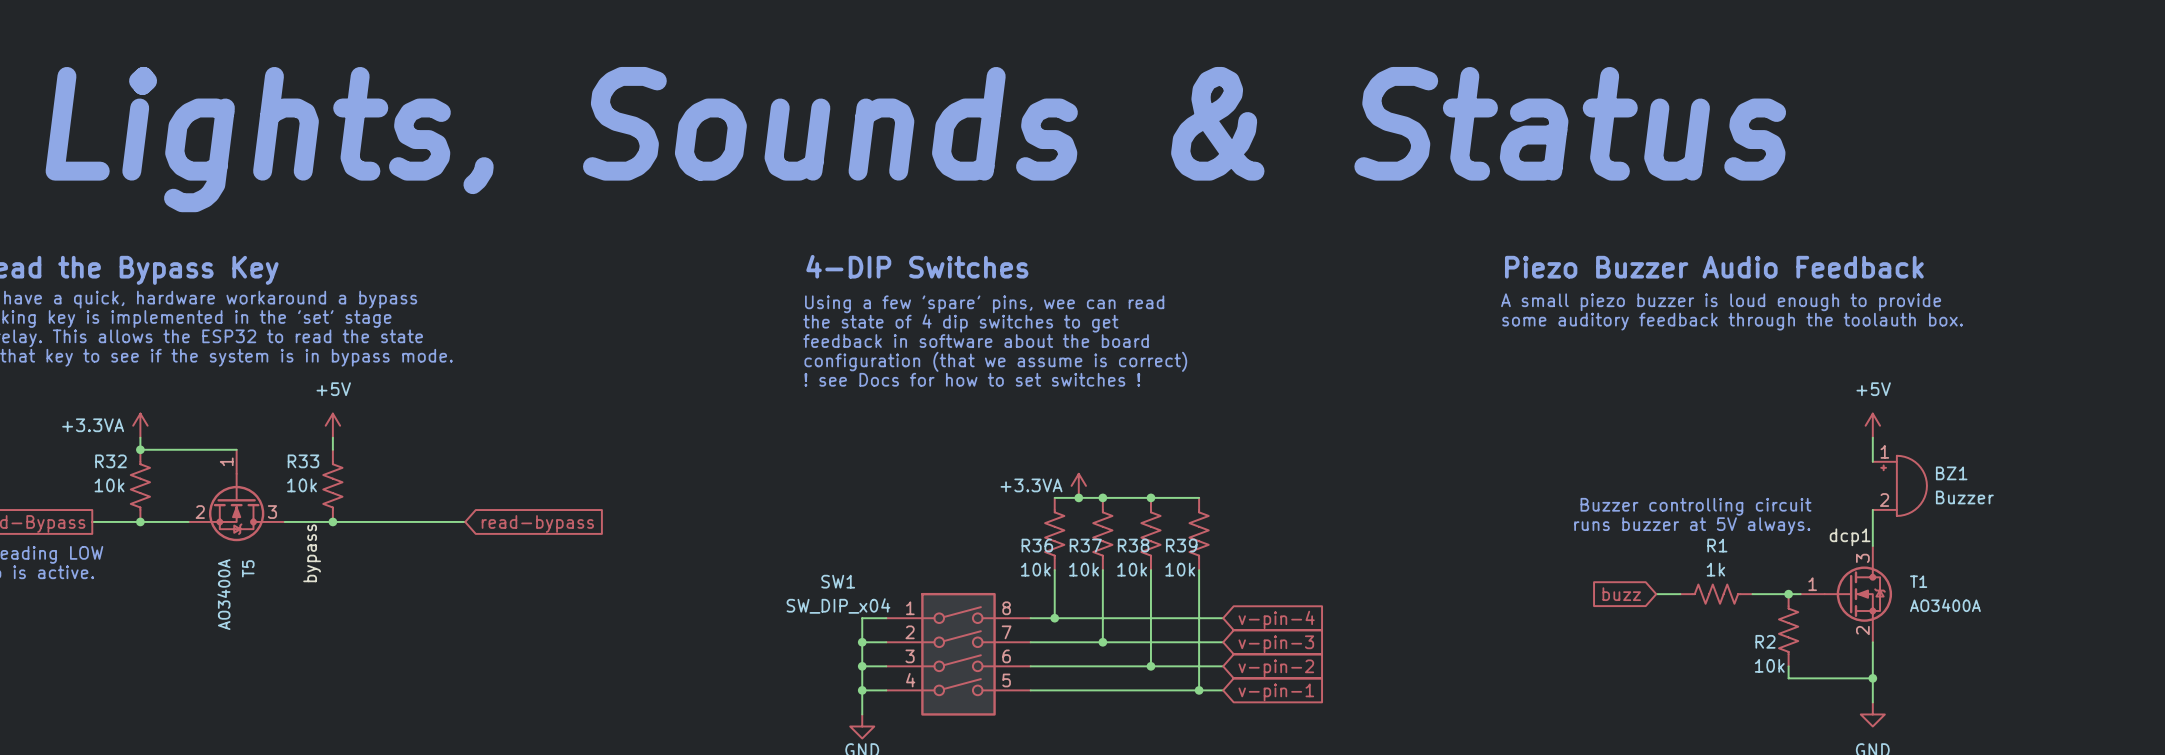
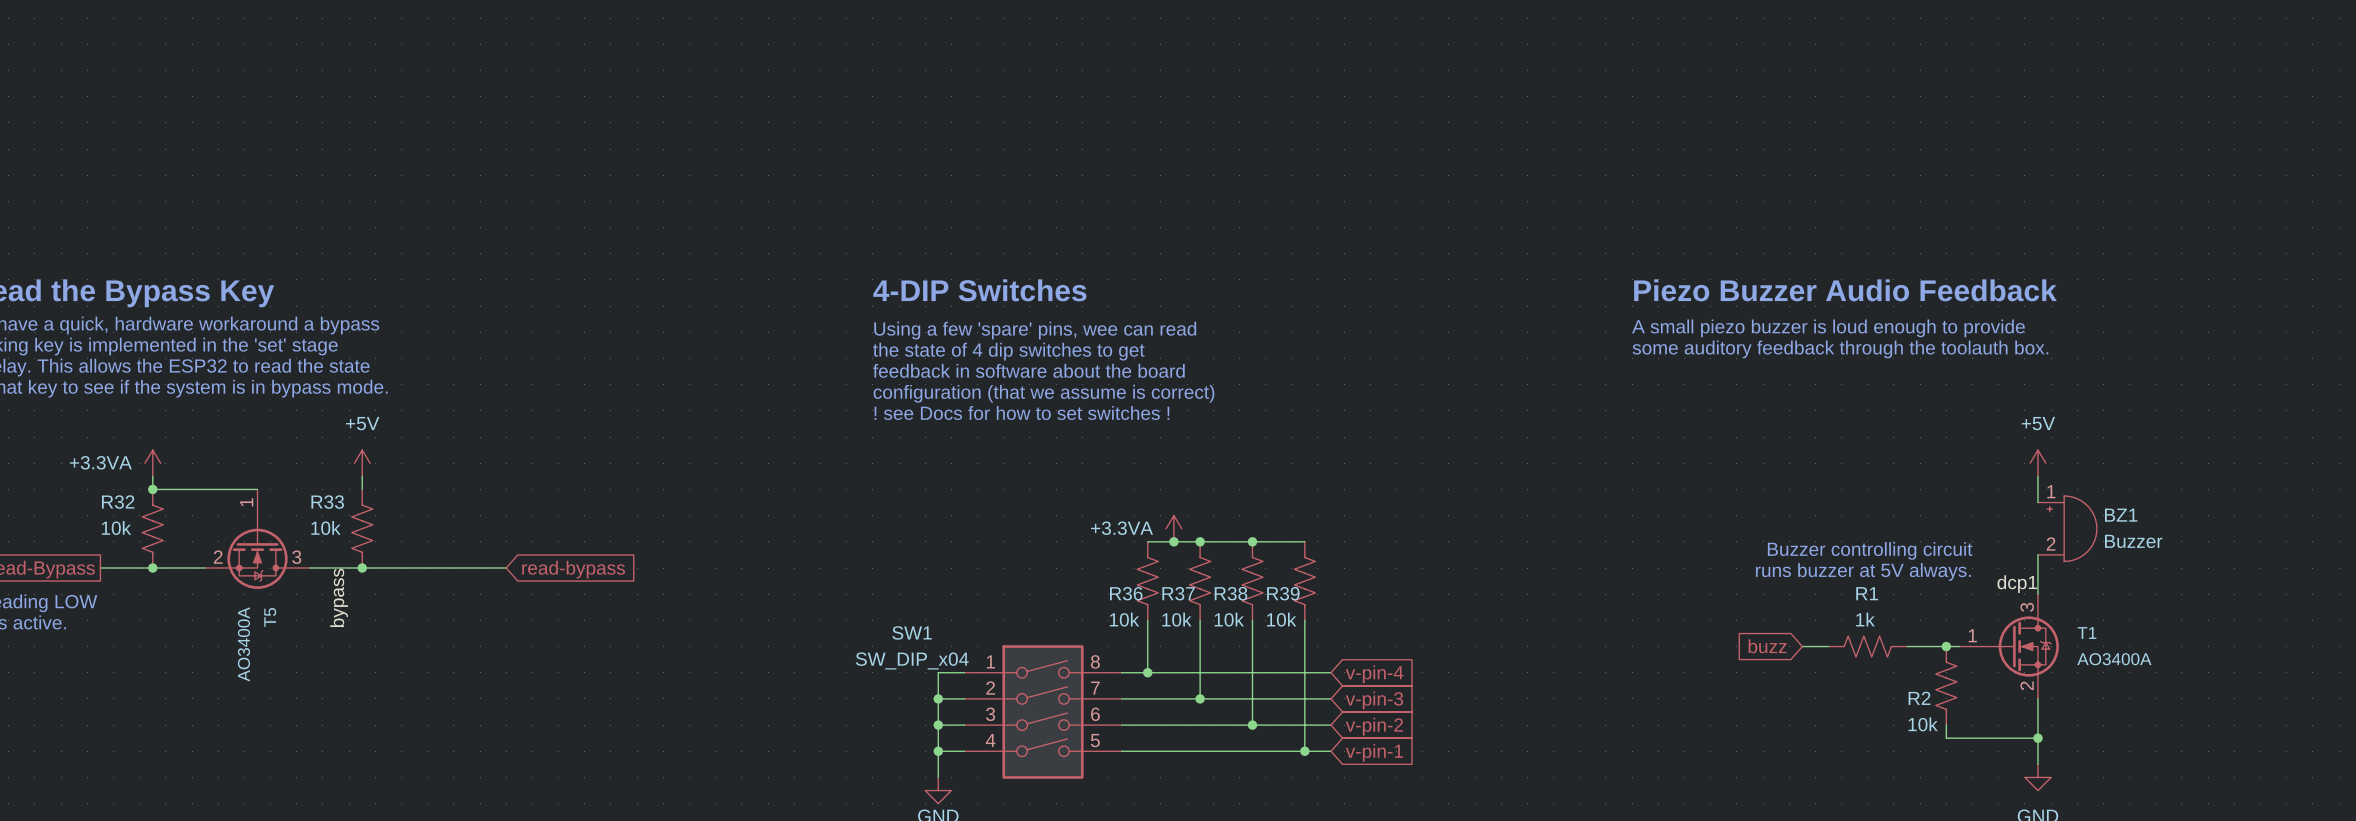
text: Lights, Sounds & Status (915, 139) -> none

